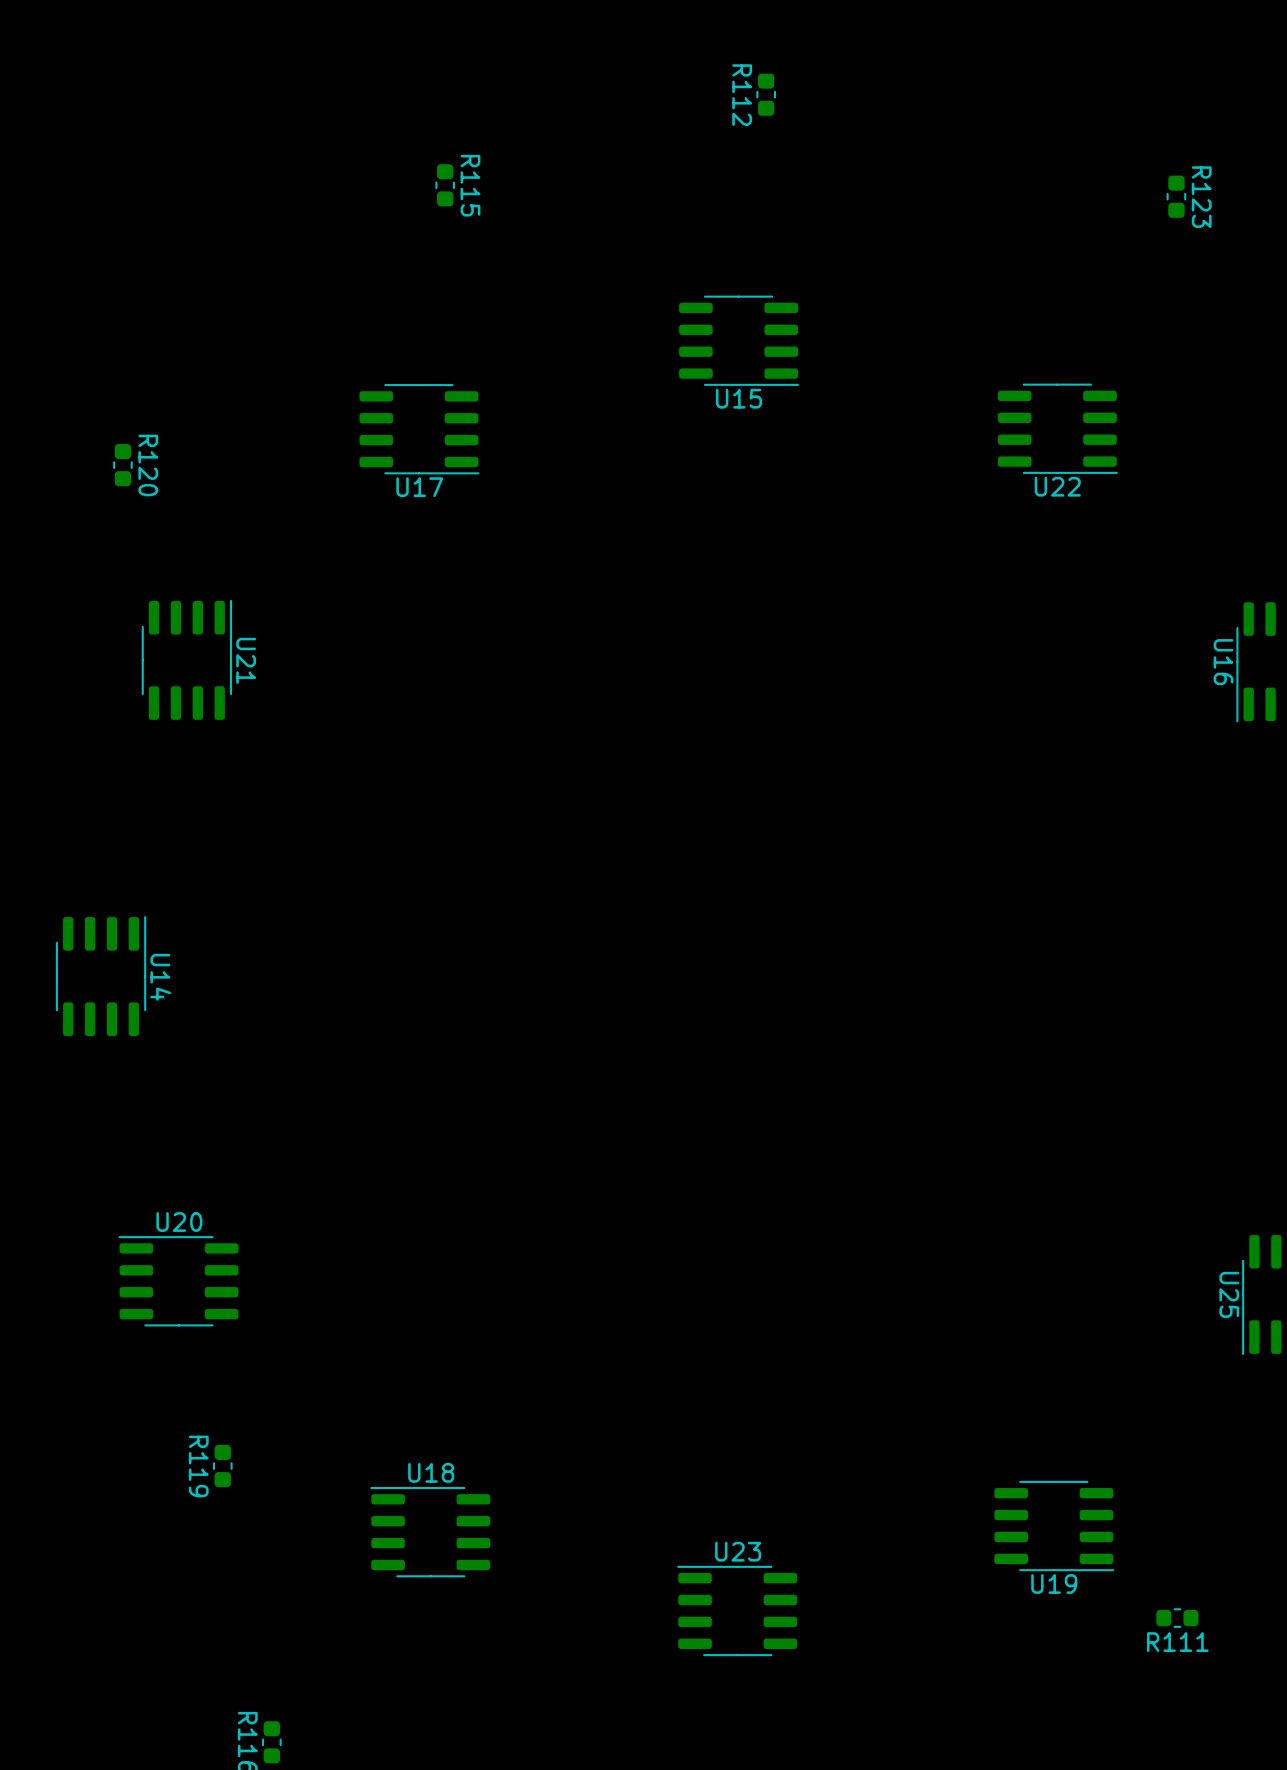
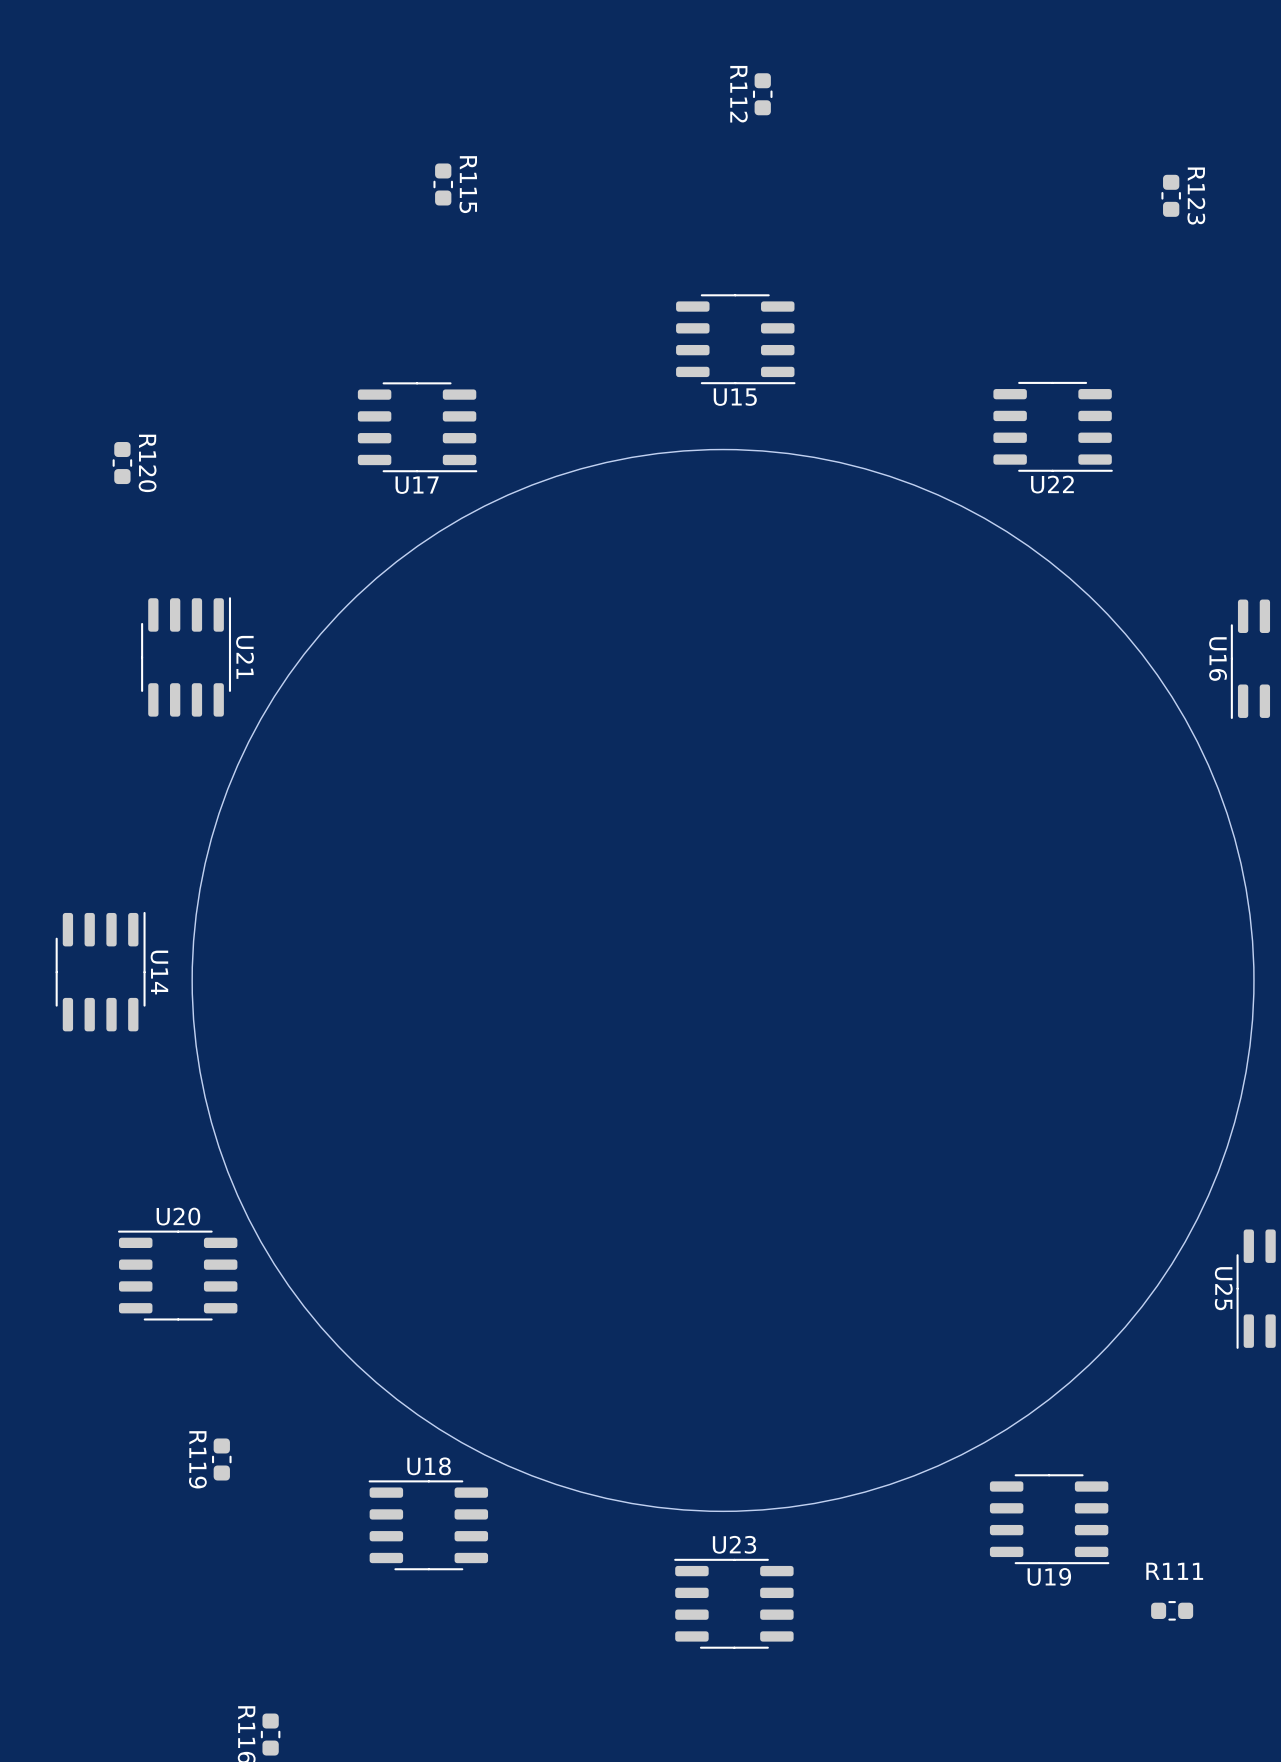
round board edge: none -> [191, 449, 1255, 1512]
R111 name position: R111 (1177, 1642) -> R111 (1174, 1571)

